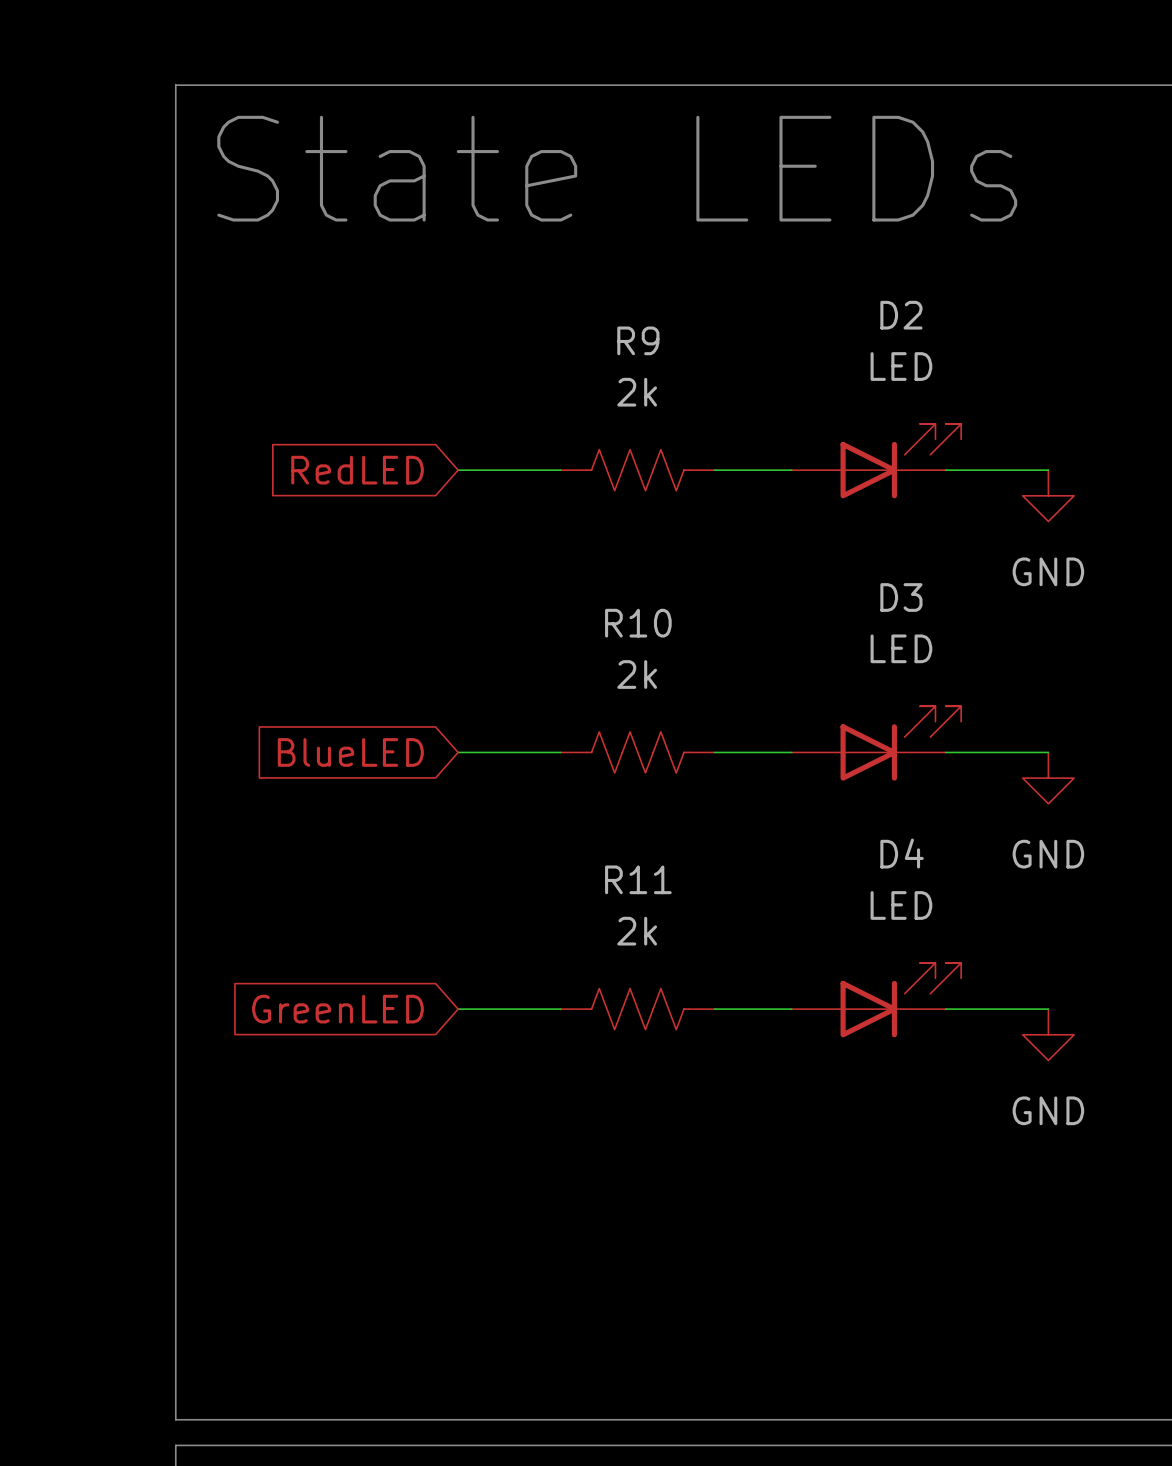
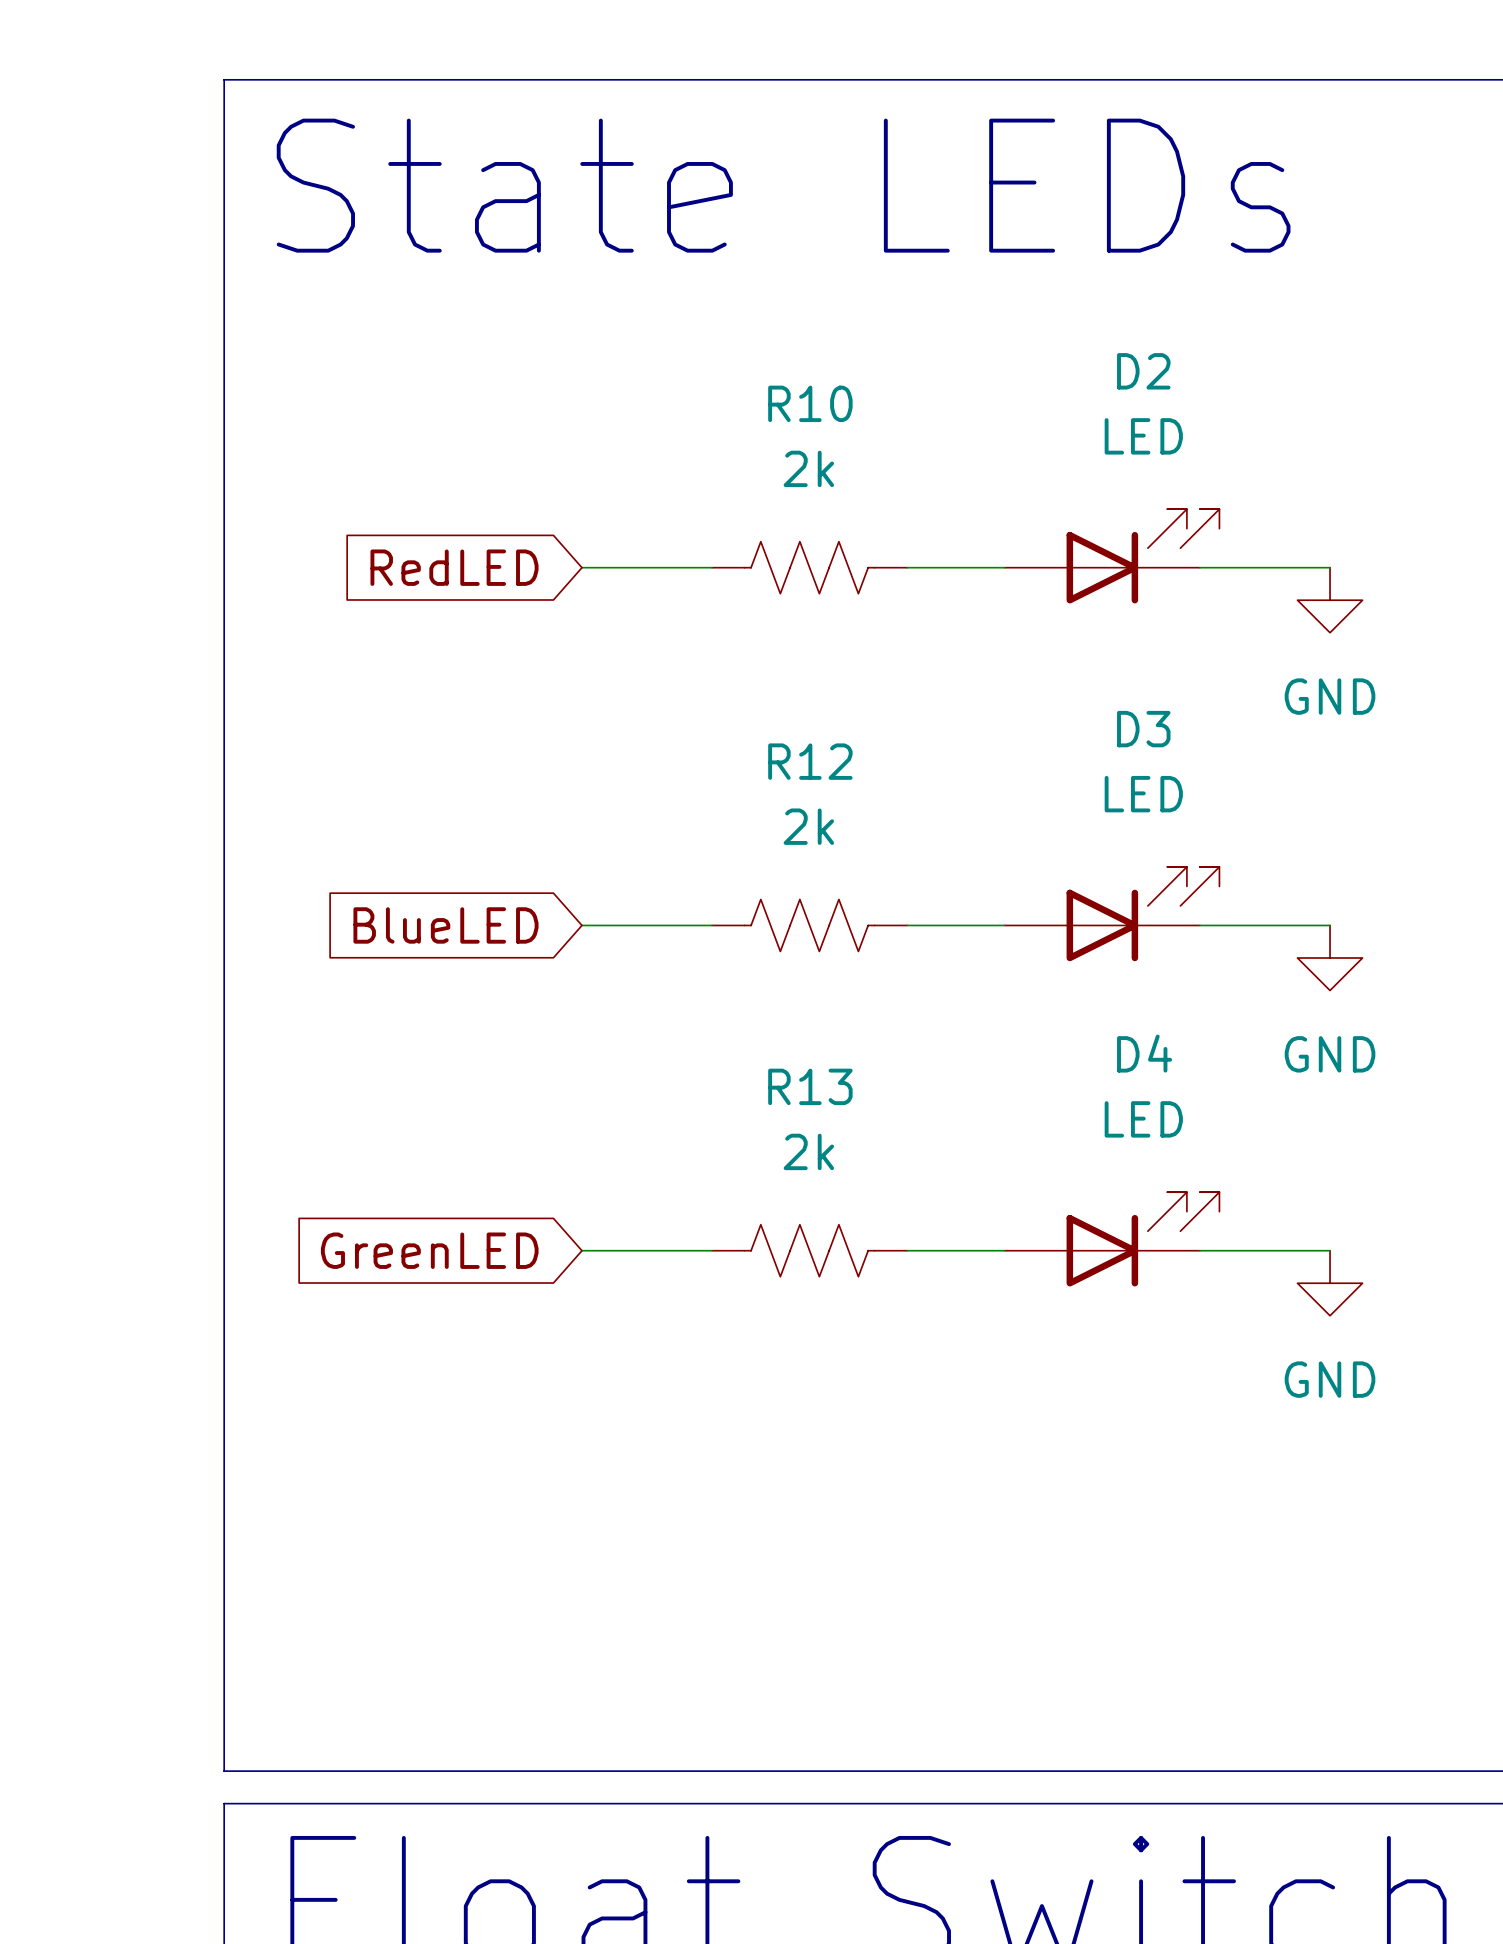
R9 name: R9 (638, 340) -> R10 (810, 403)
R10 name: R10 (638, 623) -> R12 (810, 761)
R11 name: R11 (638, 879) -> R13 (810, 1086)

